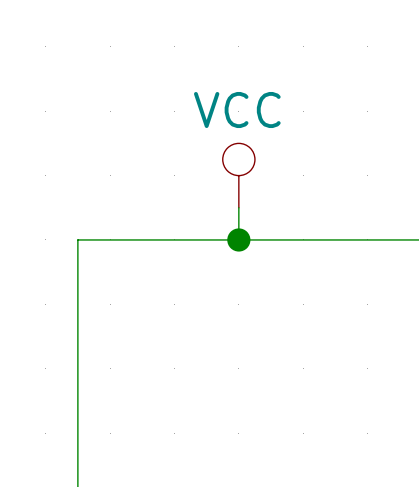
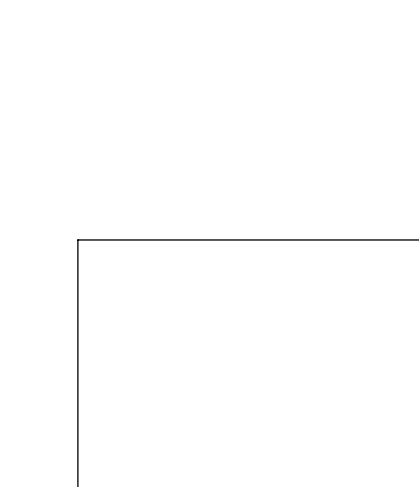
power symbol: VCC (238, 175) -> none
wire: (238, 207) (238, 239) -> none
junction: (238, 239) -> none

